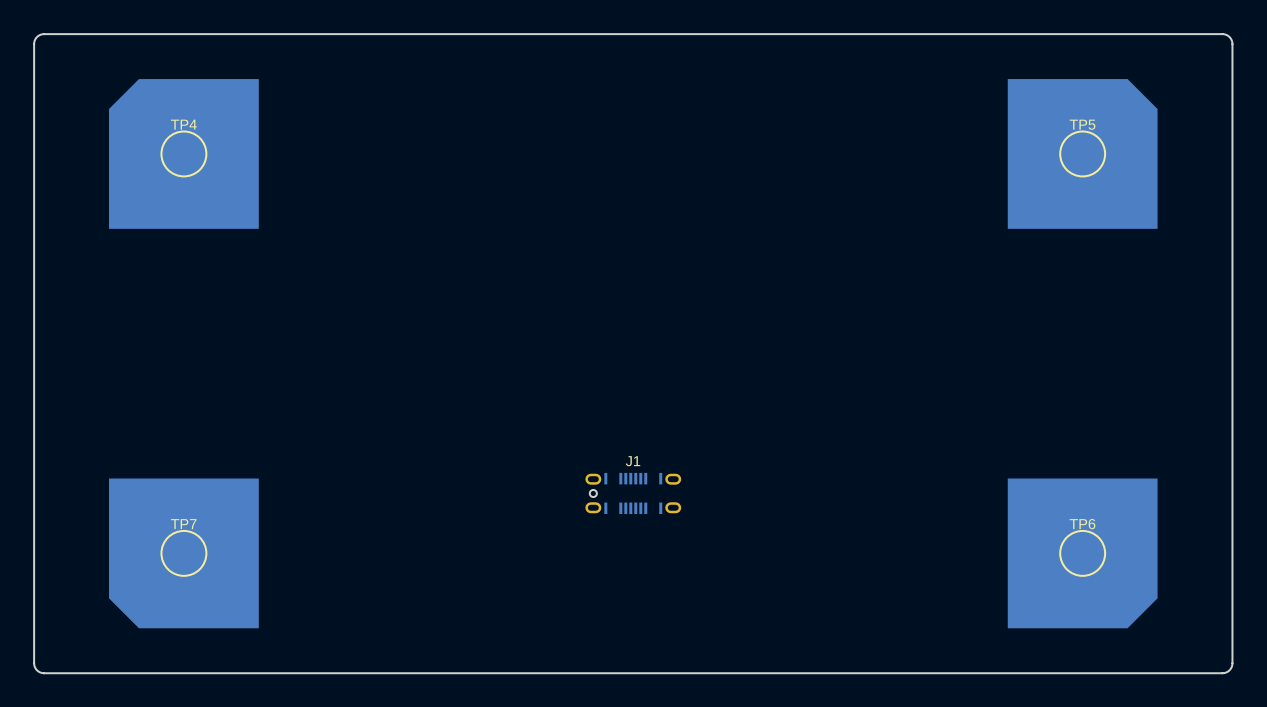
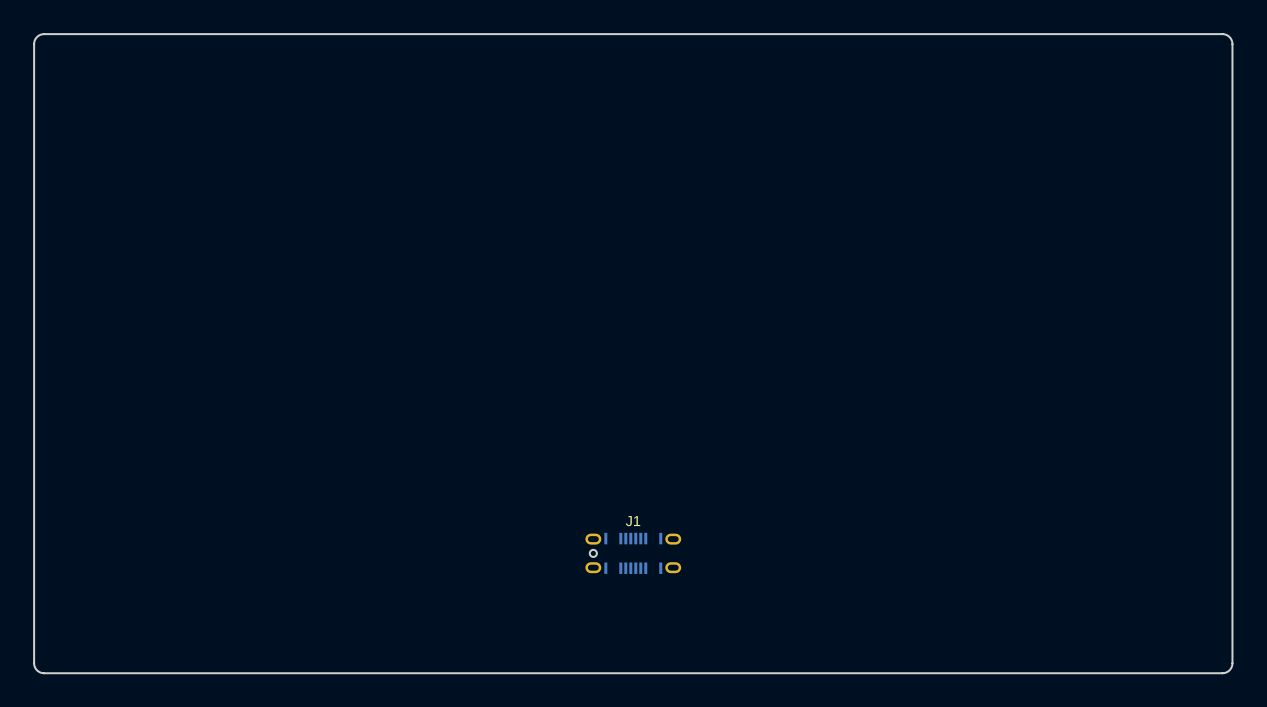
TP4: (183, 153) -> none
TP5: (1082, 153) -> none
J1 position: (633, 493) -> (633, 553)
TP7: (183, 553) -> none
TP6: (1082, 553) -> none

